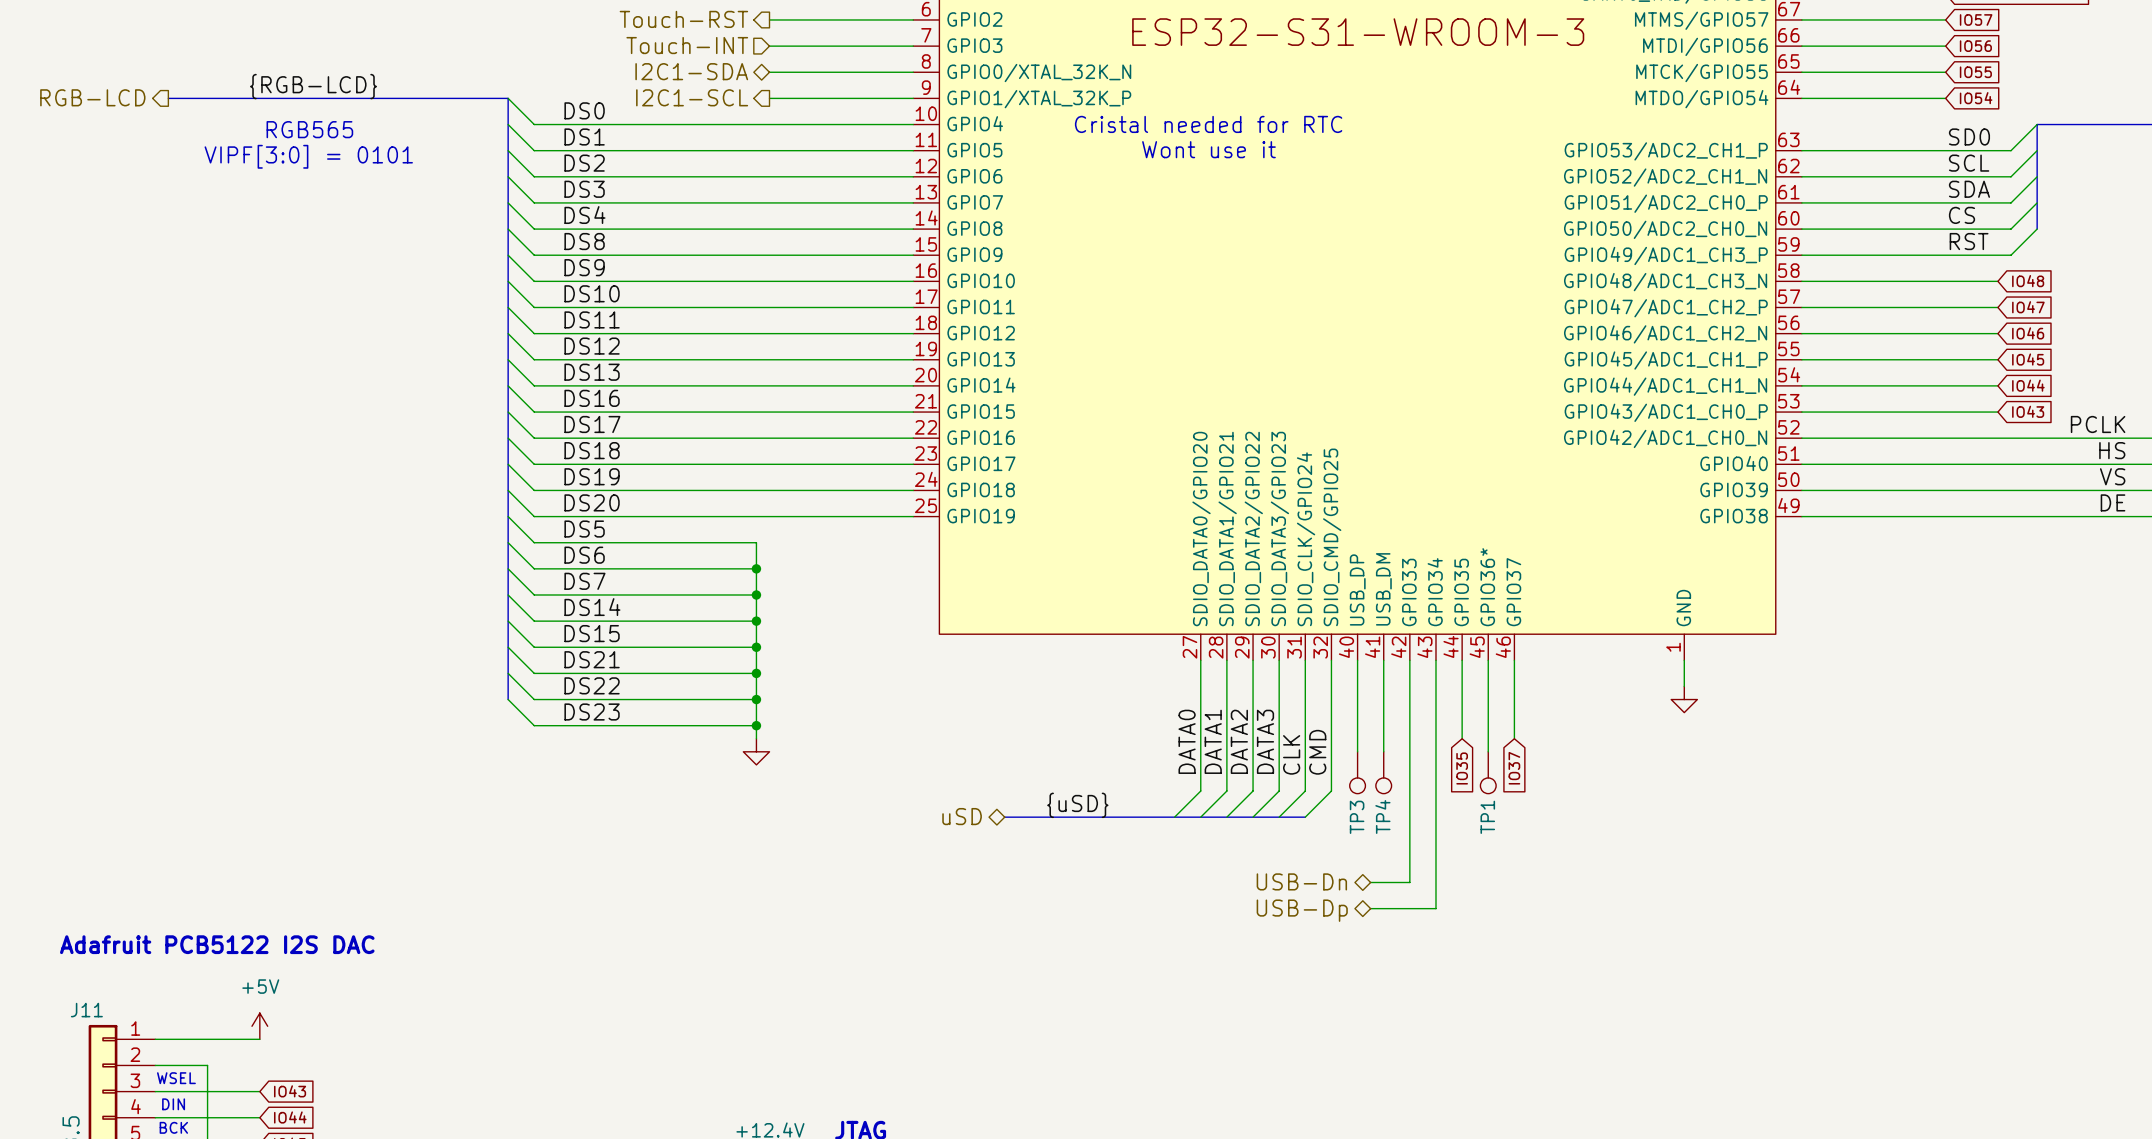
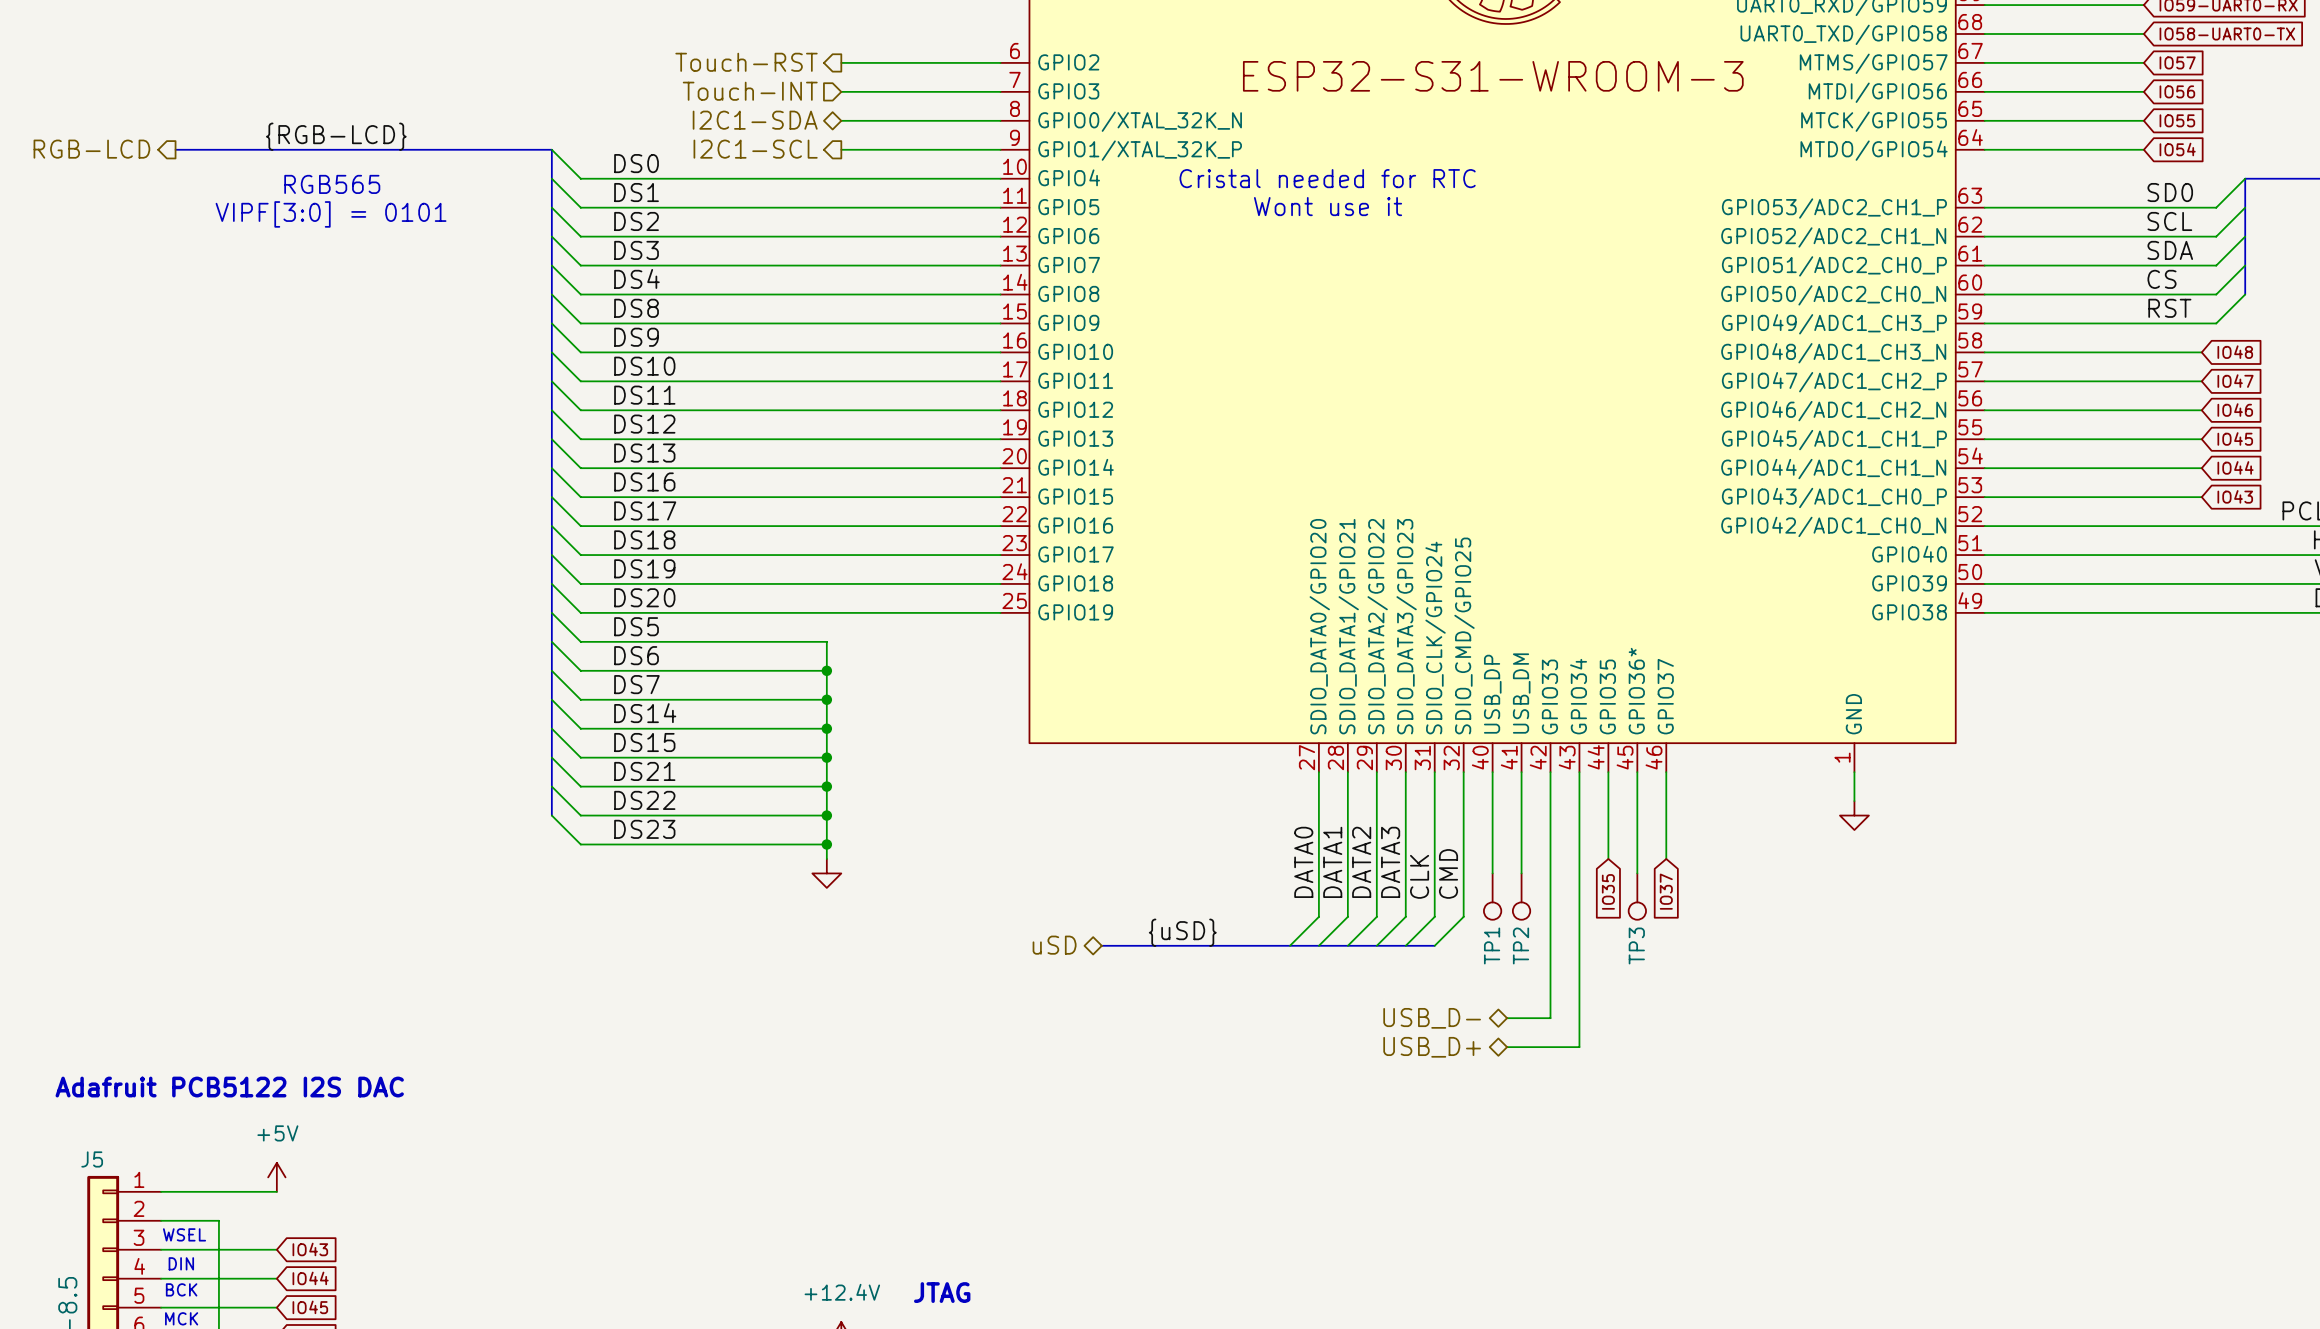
TP3 name: TP3 (1357, 817) -> TP1 (1492, 945)
TP4 name: TP4 (1382, 817) -> TP2 (1521, 945)
TP1 name: TP1 (1487, 817) -> TP3 (1636, 945)
hierarchical label: USB-Dn (1301, 881) -> USB_D- (1432, 1018)
hierarchical label: USB-Dp (1302, 910) -> USB_D+ (1432, 1047)
J11 name: J11 (86, 1010) -> J5 (92, 1159)

